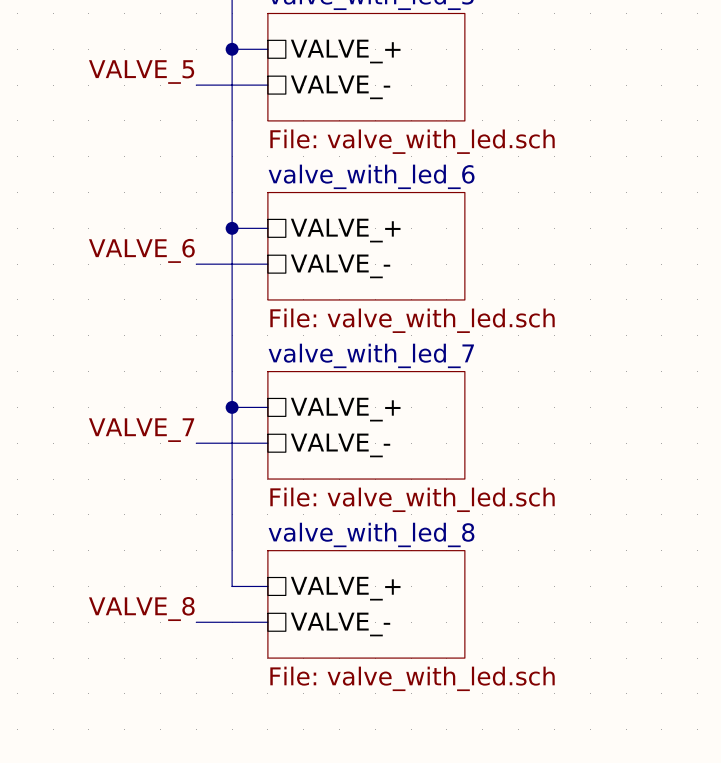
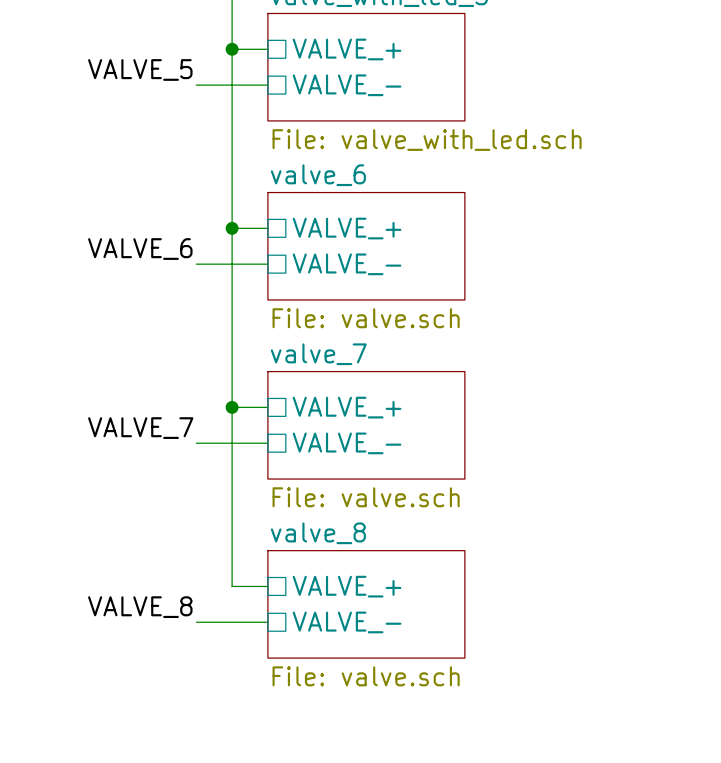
sheet valve_with_led_6 name: valve_with_led_6 (371, 176) -> valve_6 (318, 175)
sheet valve_with_led_6 value: File: valve_with_led.sch (412, 320) -> File: valve.sch (366, 318)
sheet valve_with_led_7 name: valve_with_led_7 (371, 355) -> valve_7 (318, 354)
sheet valve_with_led_7 value: File: valve_with_led.sch (412, 499) -> File: valve.sch (366, 497)
sheet valve_with_led_8 name: valve_with_led_8 (371, 534) -> valve_8 (318, 533)
sheet valve_with_led_8 value: File: valve_with_led.sch (412, 678) -> File: valve.sch (366, 676)

